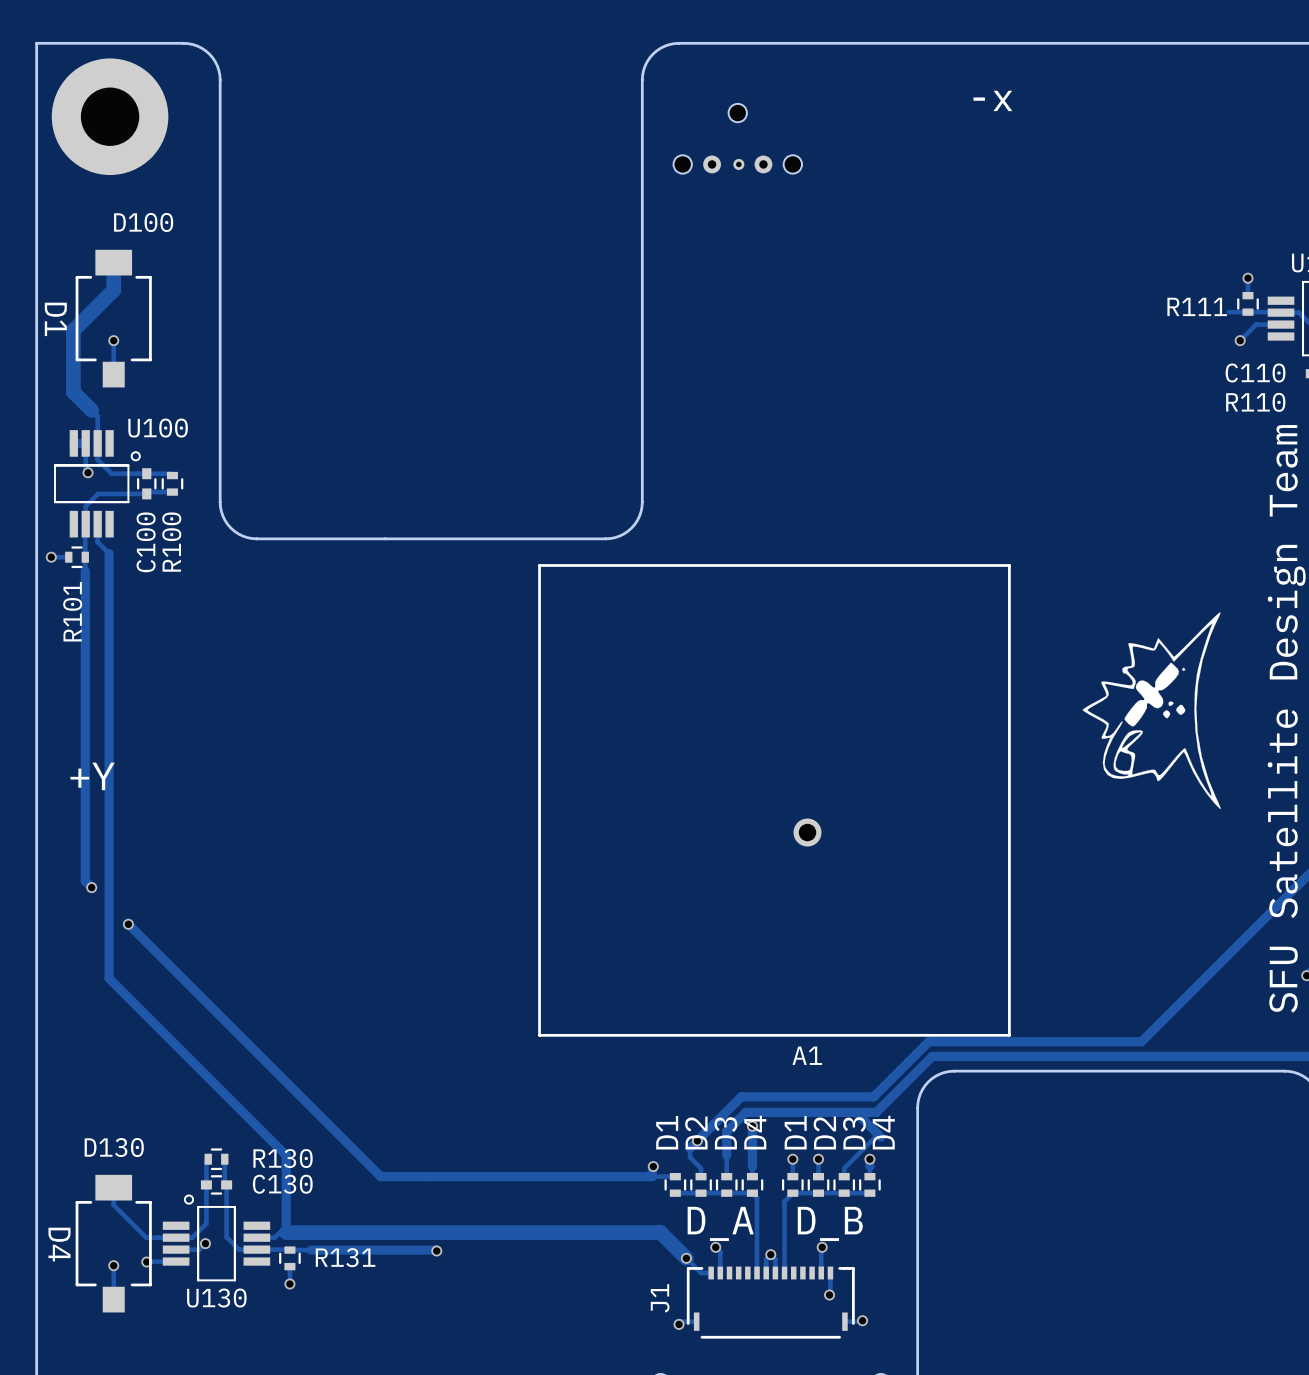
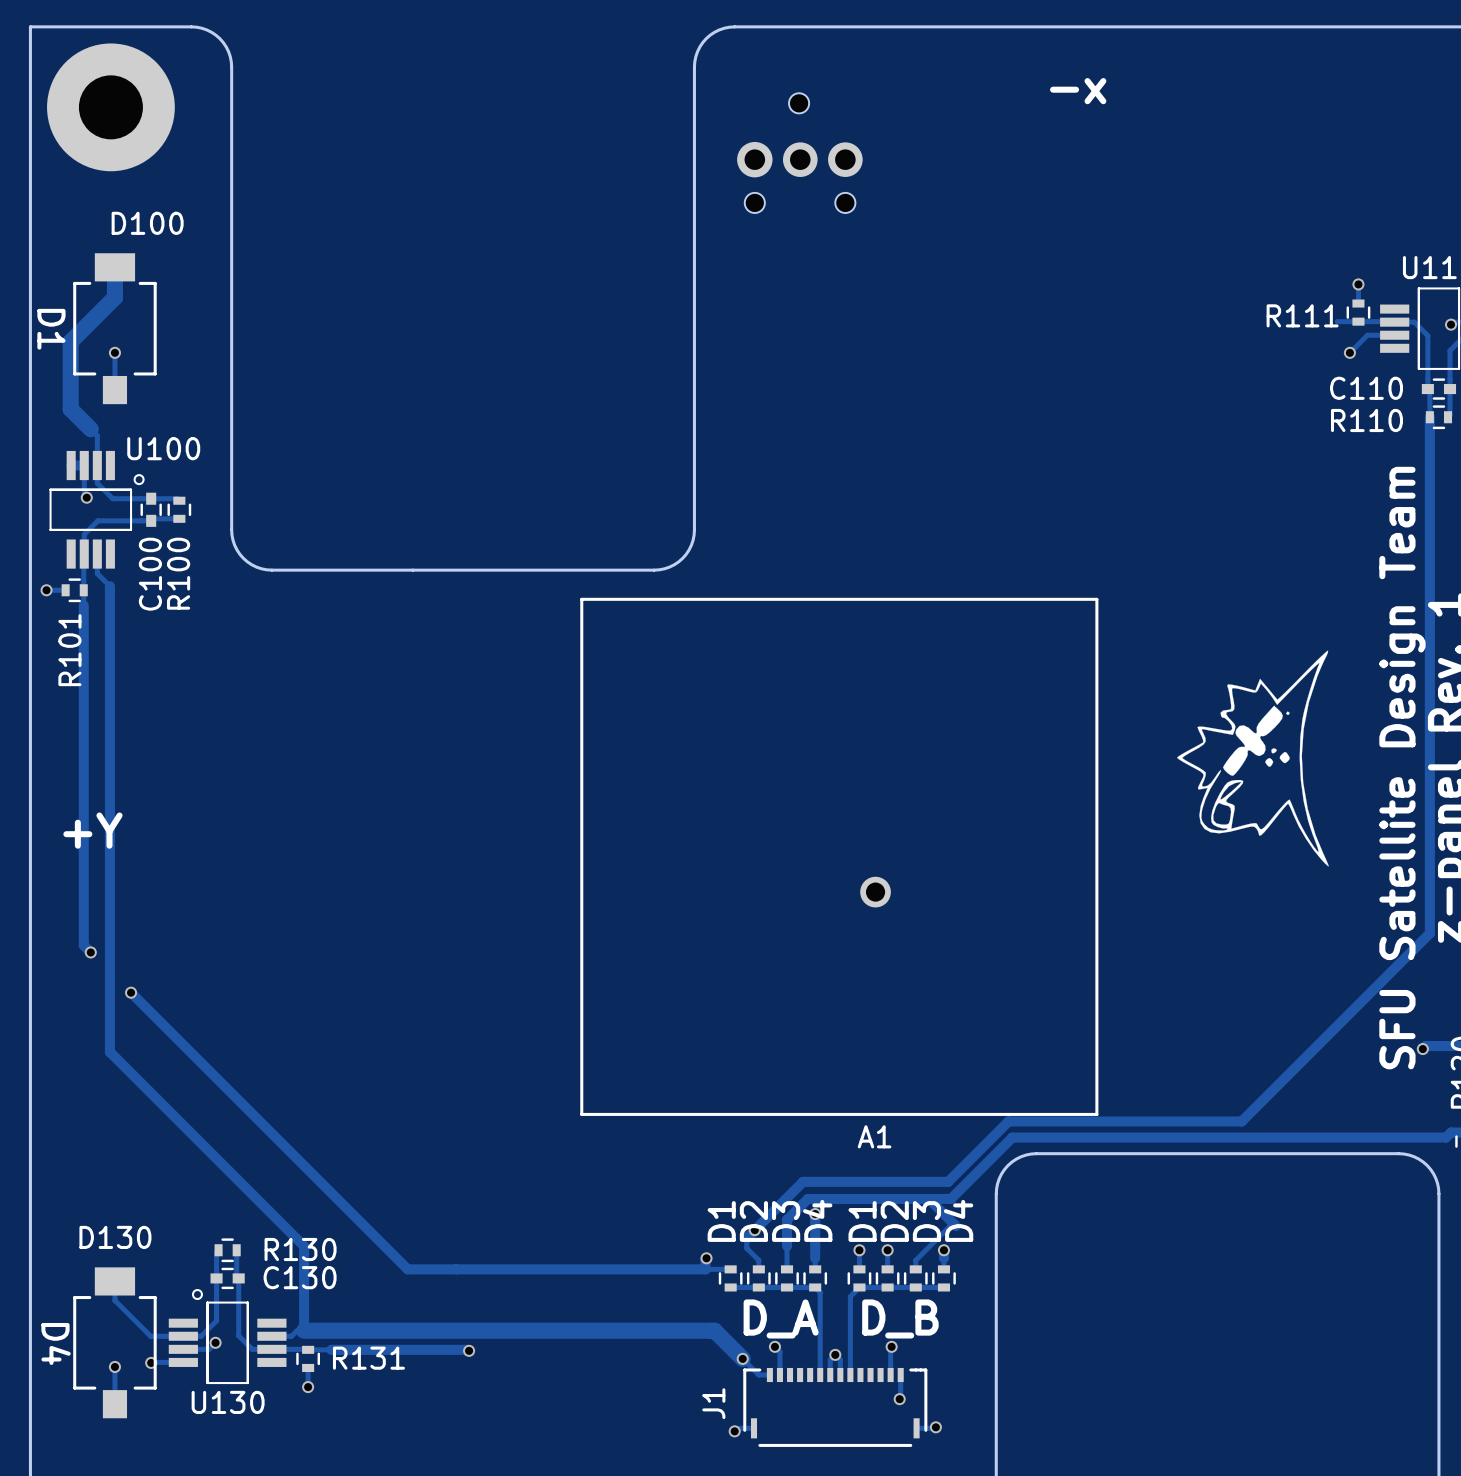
part footprint: [733, 158, 745, 170] -> [782, 142, 818, 177]
part position: (682, 164) -> (754, 202)
part: none -> (754, 159)
part: (712, 164) -> none
part: (763, 164) -> none
part: none -> (845, 159)
part position: (792, 164) -> (845, 202)

